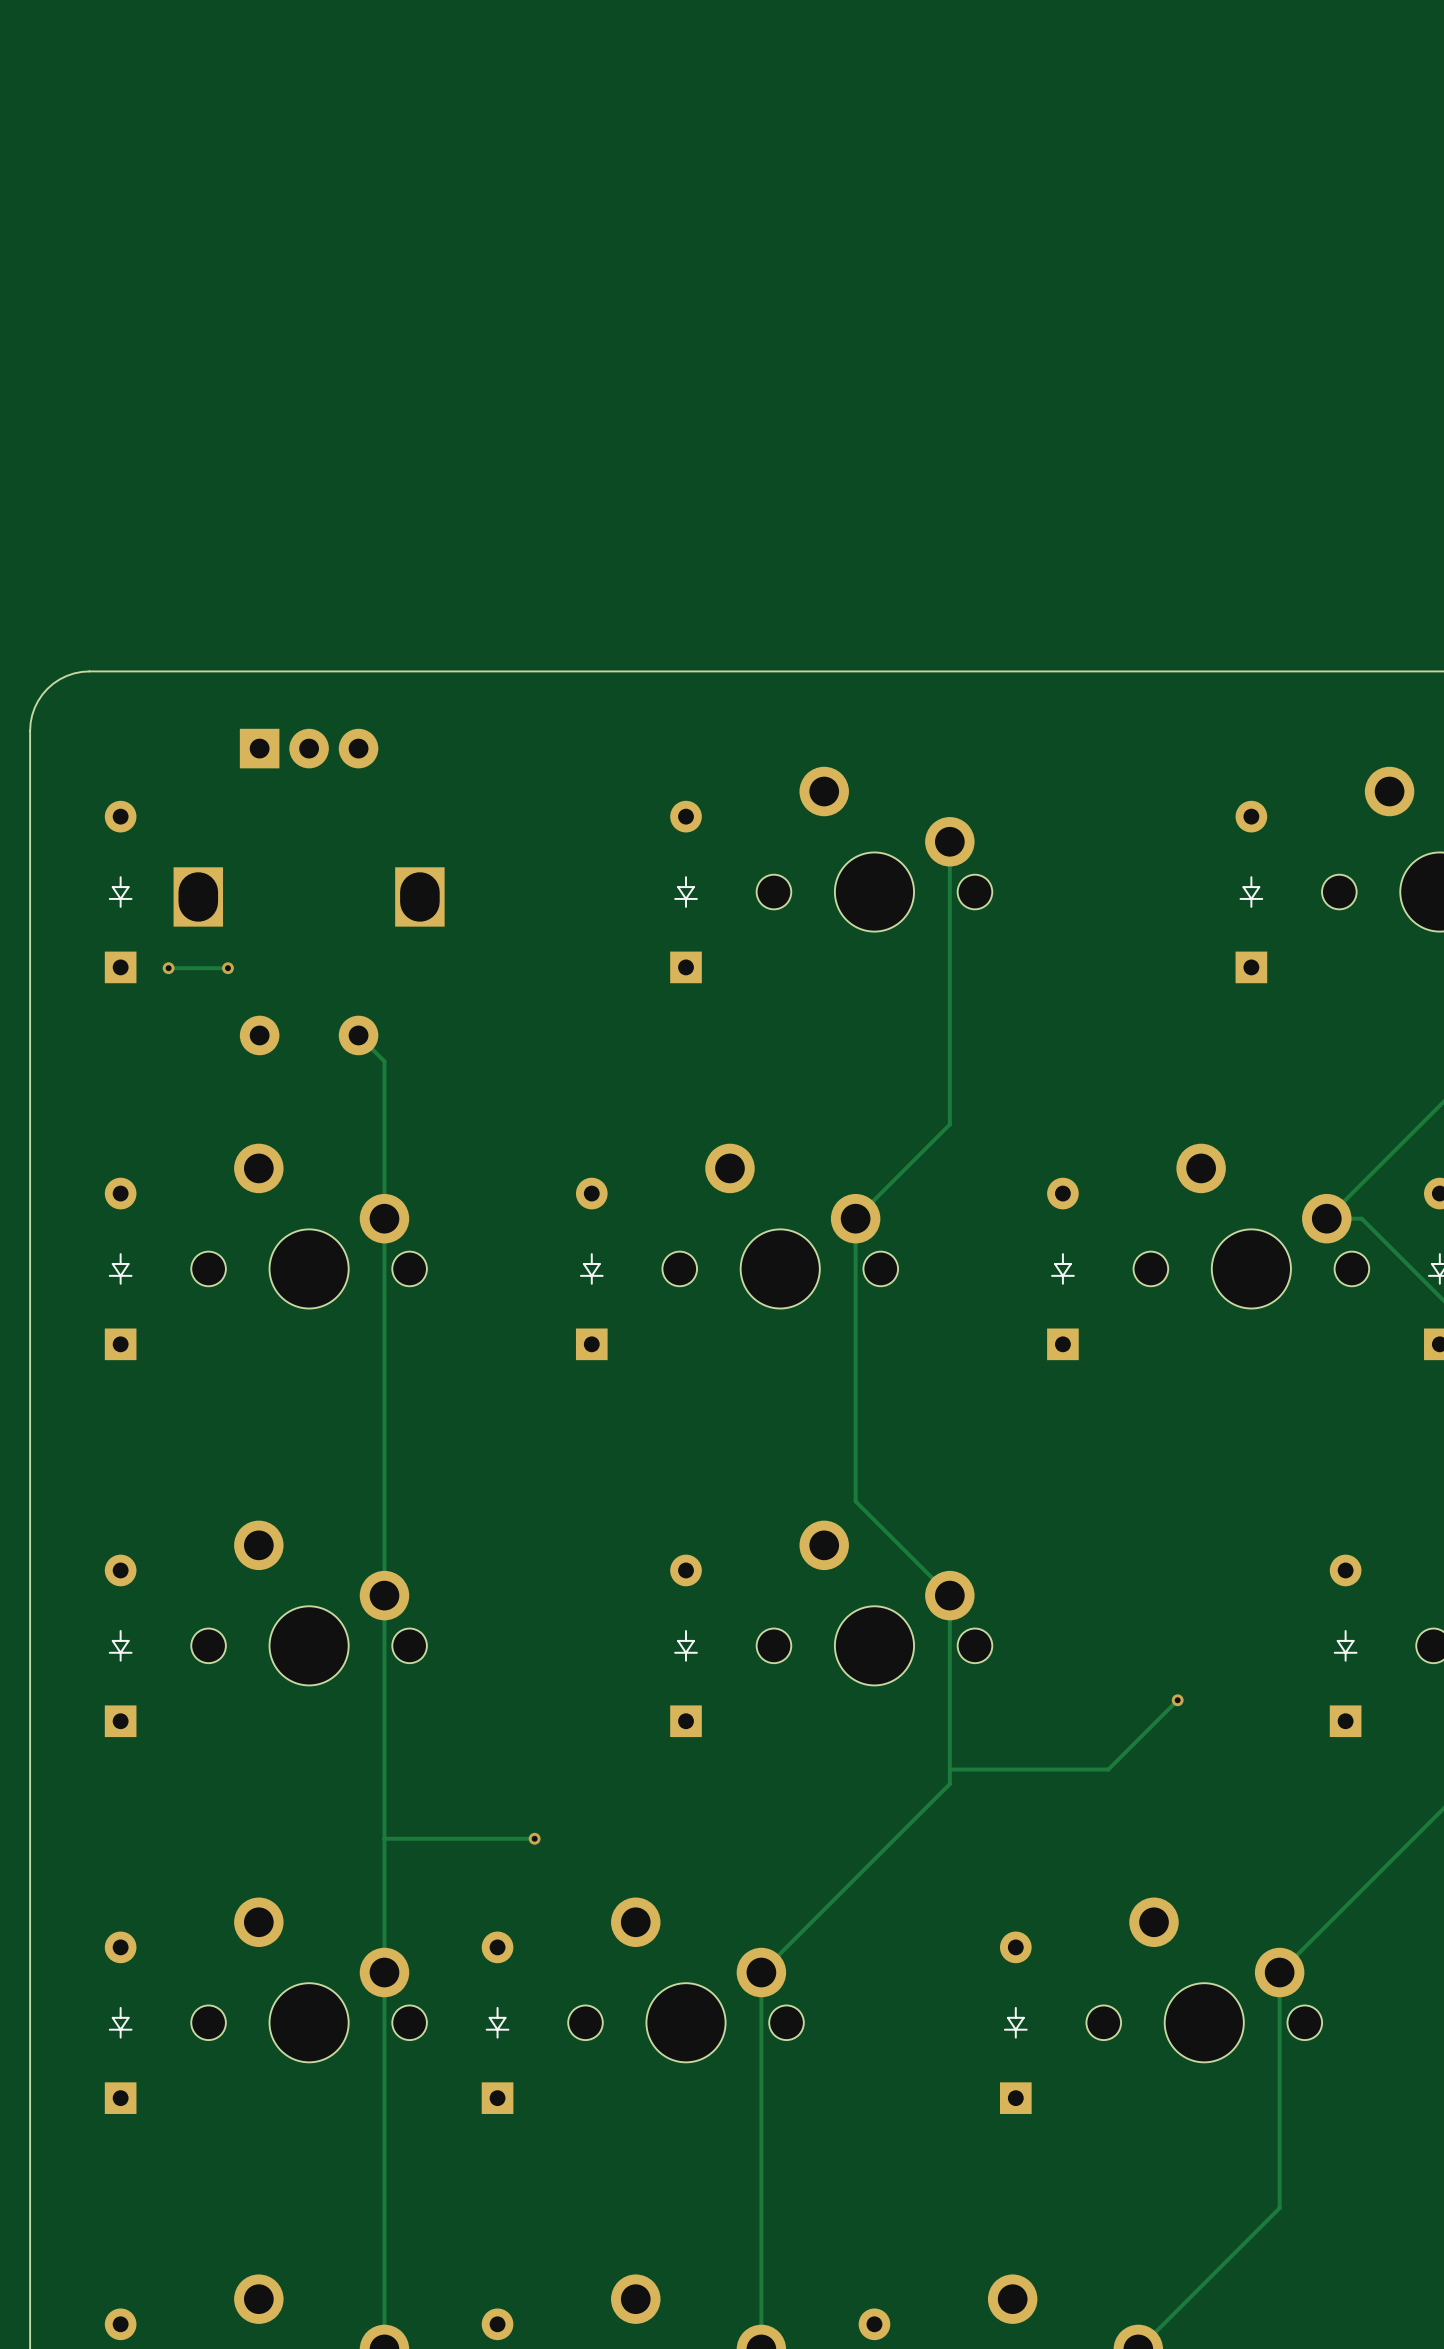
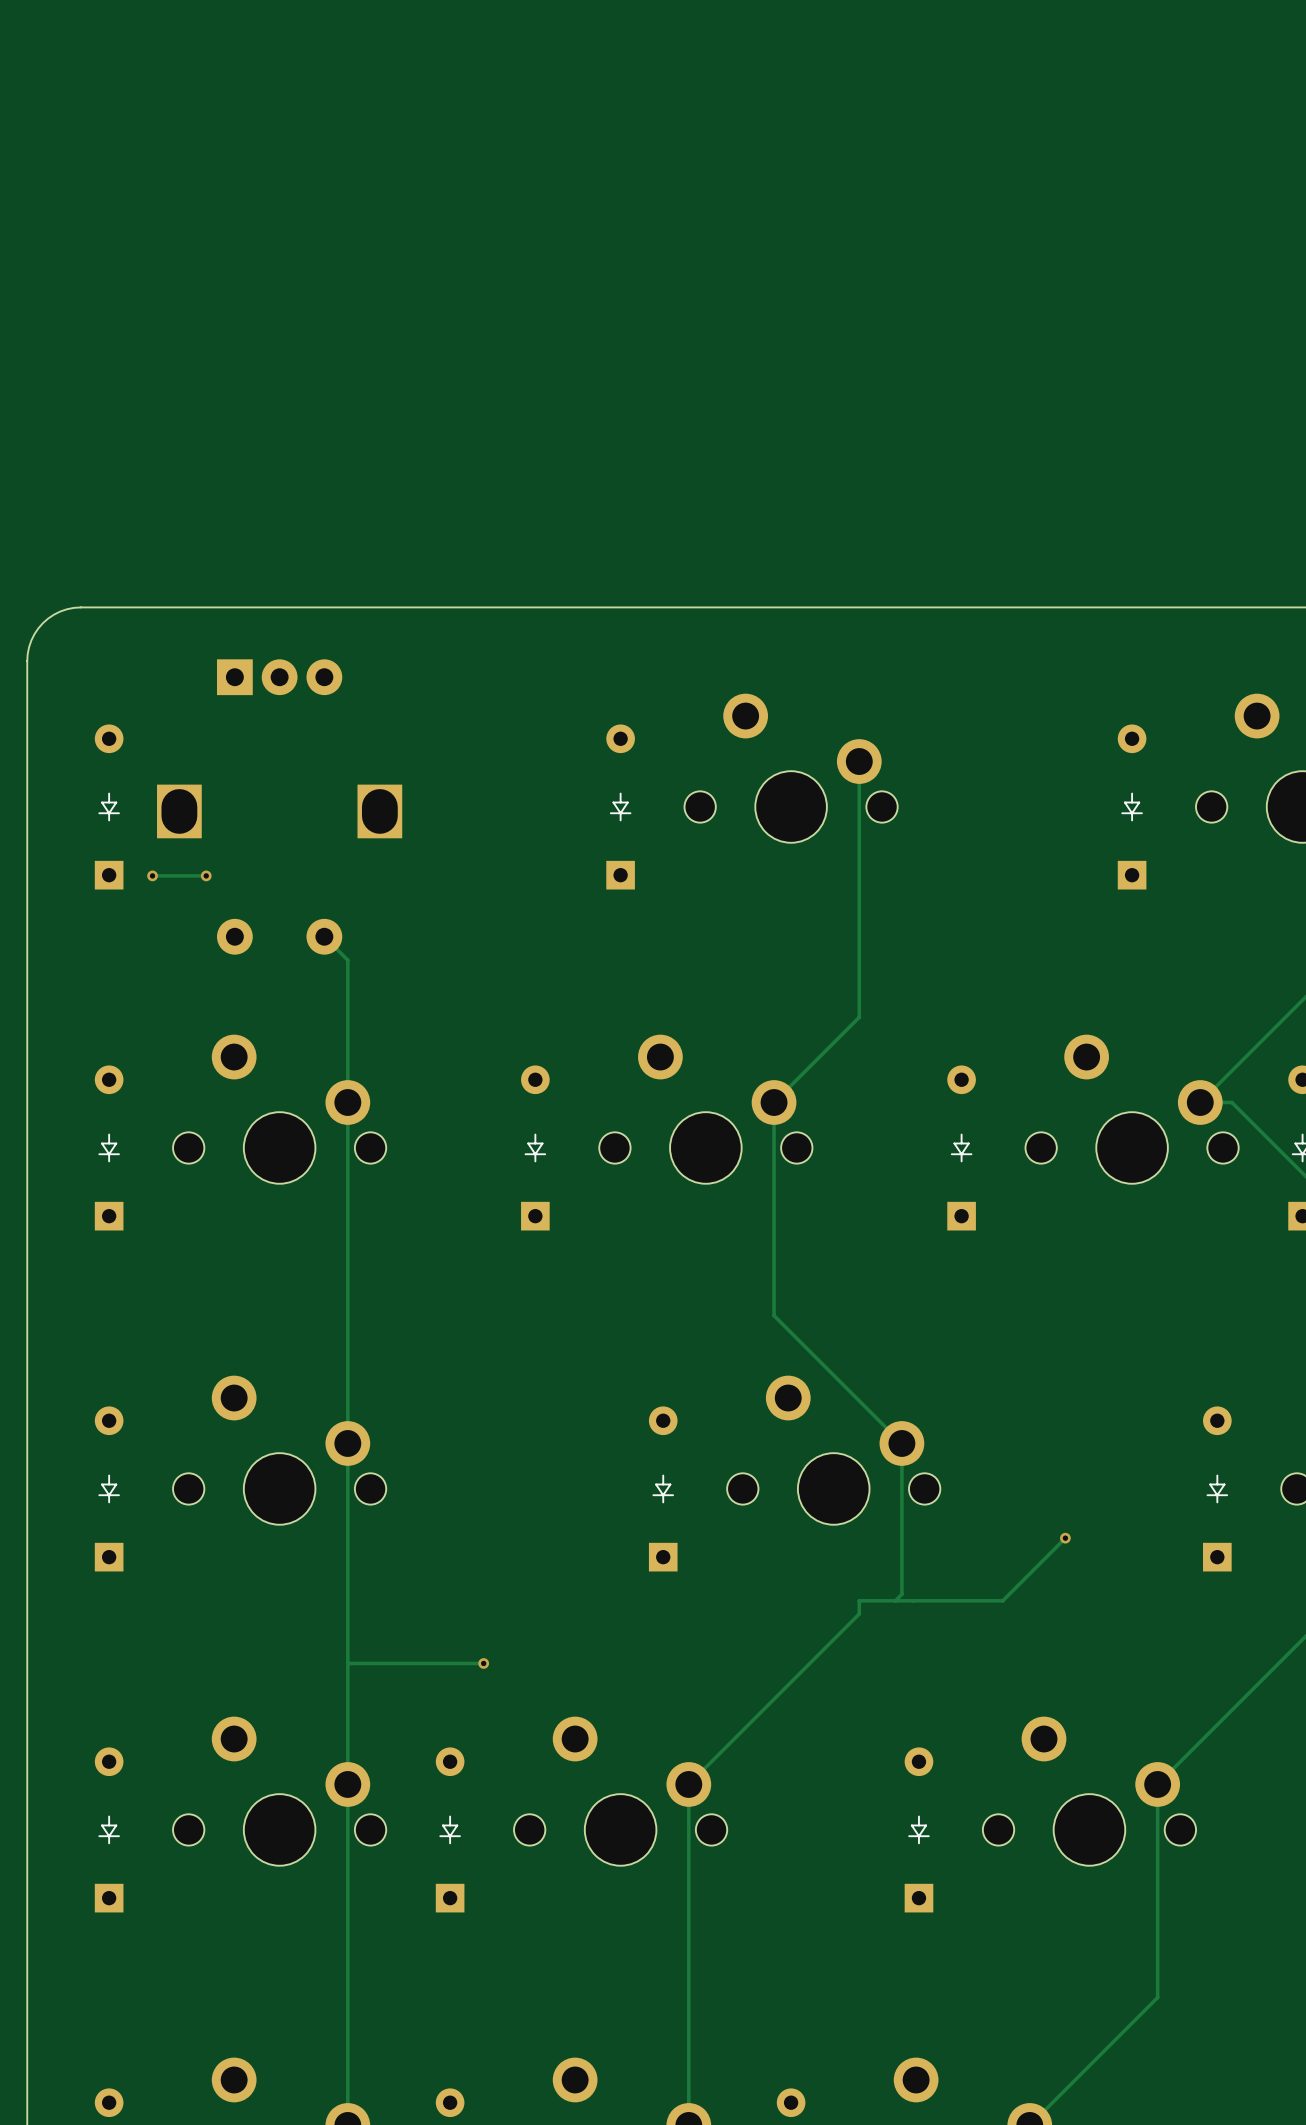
track: (855, 1454) (855, 1501) (949, 1595) (949, 1769) -> (774, 1315) (901, 1443) (901, 1594) (895, 1600)
part position: (874, 1603) -> (833, 1450)
part position: (686, 1645) -> (663, 1488)

